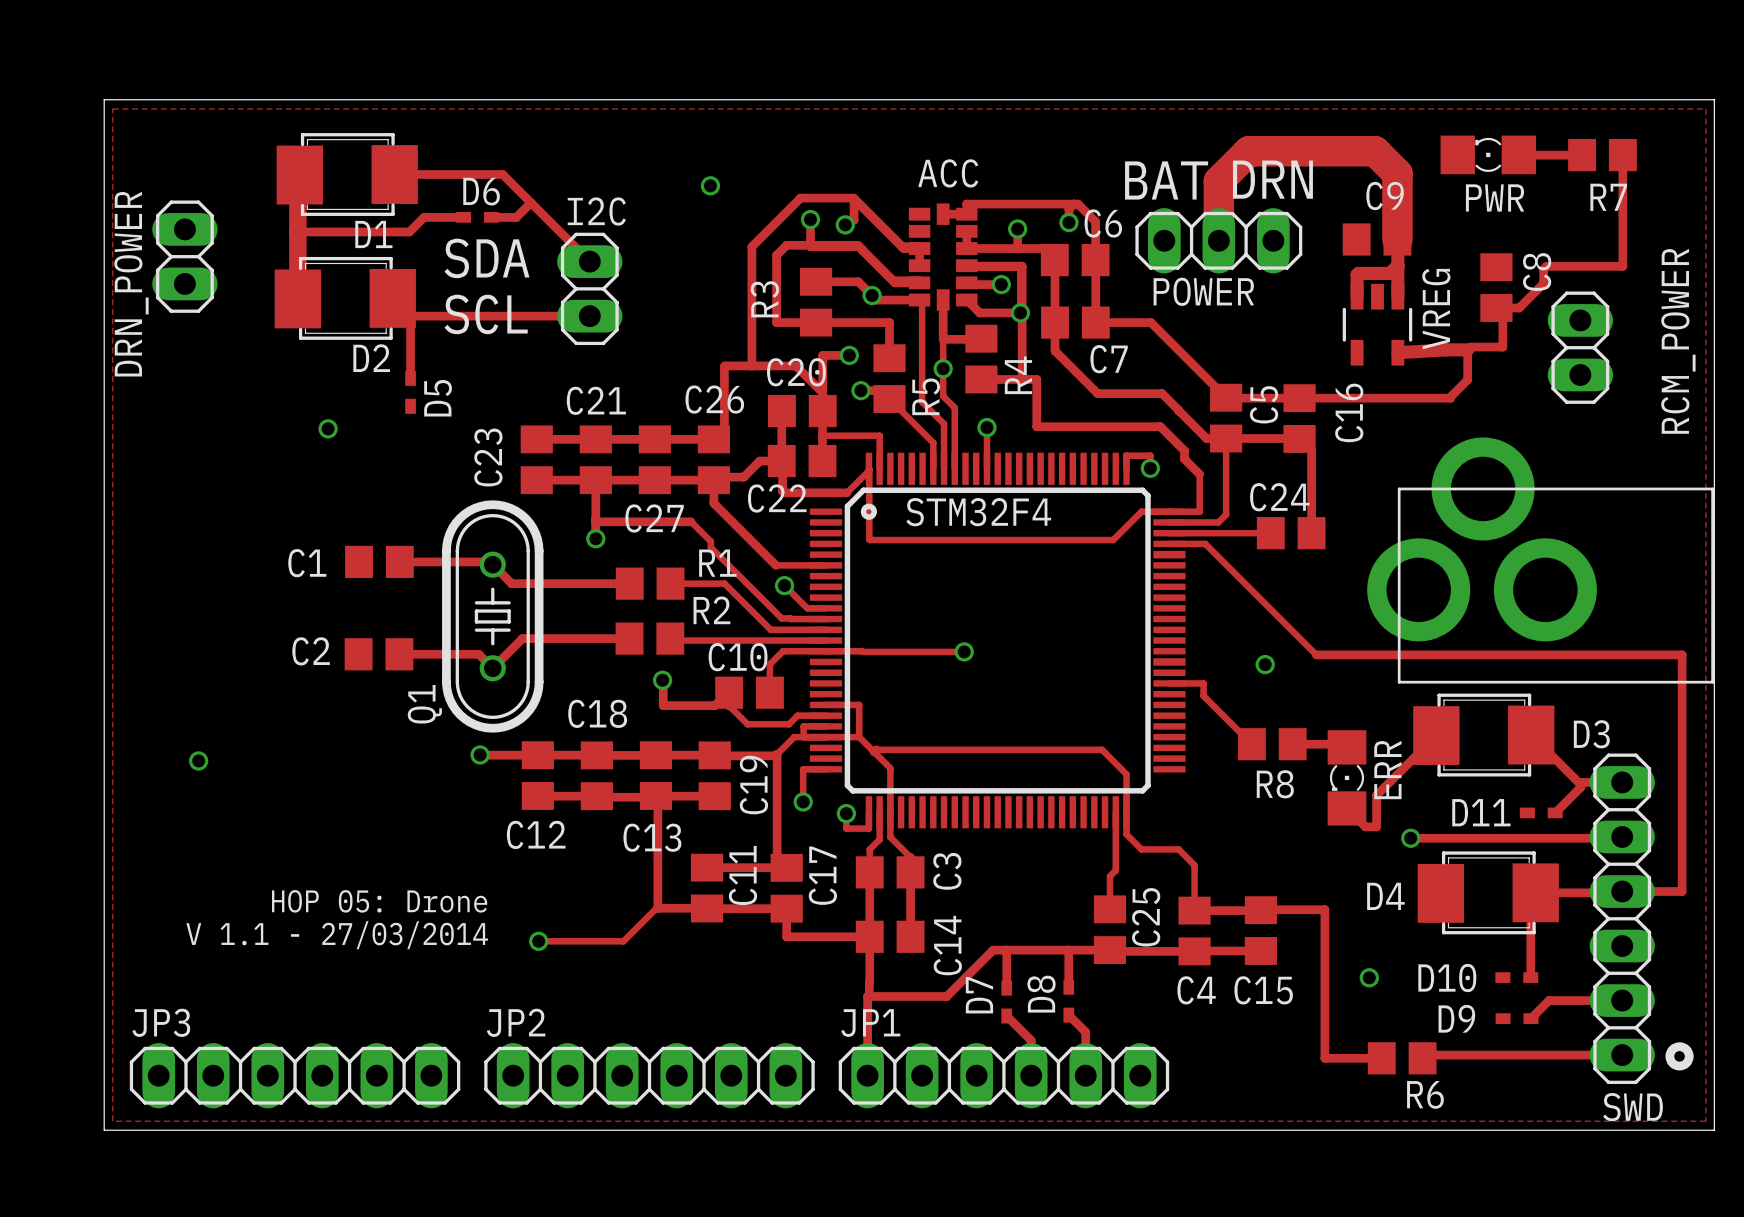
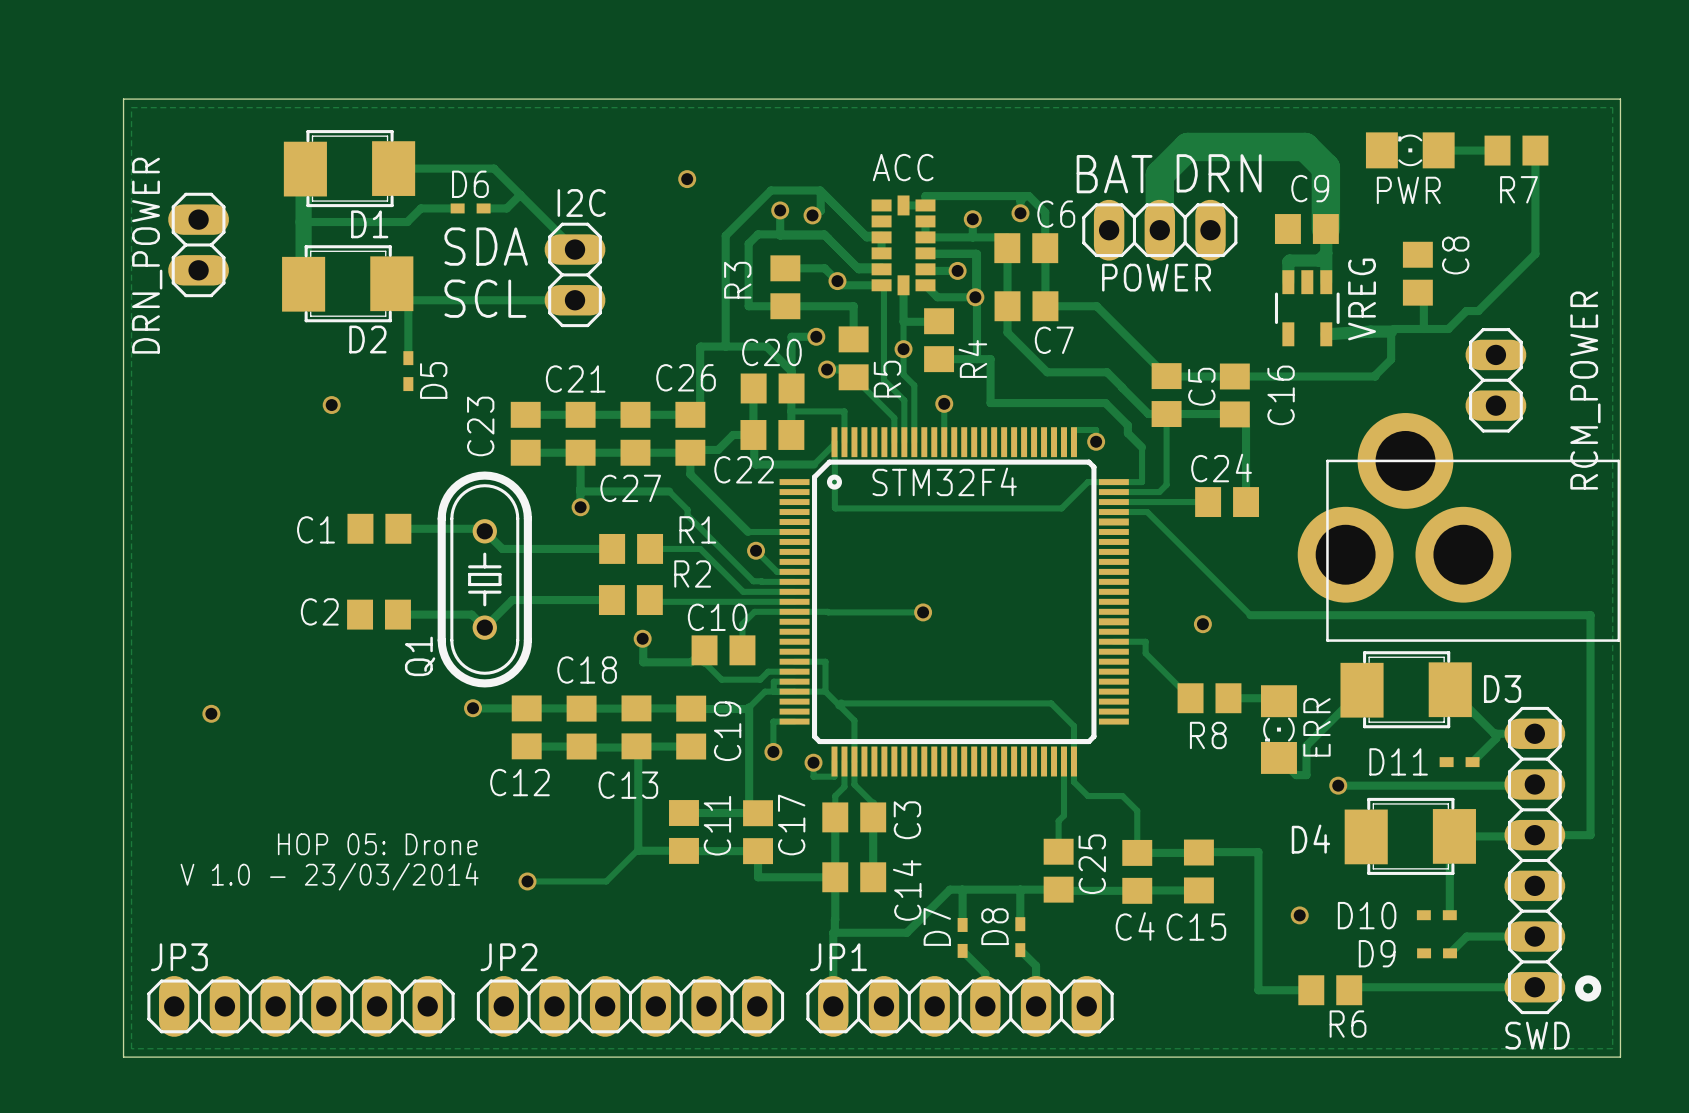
track: (1622, 266) (1546, 266) (1543, 269) (1543, 283) (1519, 307) (1496, 307) -> (1535, 253) (1478, 311) (1466, 311) (1448, 329) (1423, 329)
RCM_POWER position: (1580, 347) -> (1495, 380)
text: V 1.1 - 27/03/2014 (337, 935) -> V 1.0 - 23/03/2014 (329, 876)

